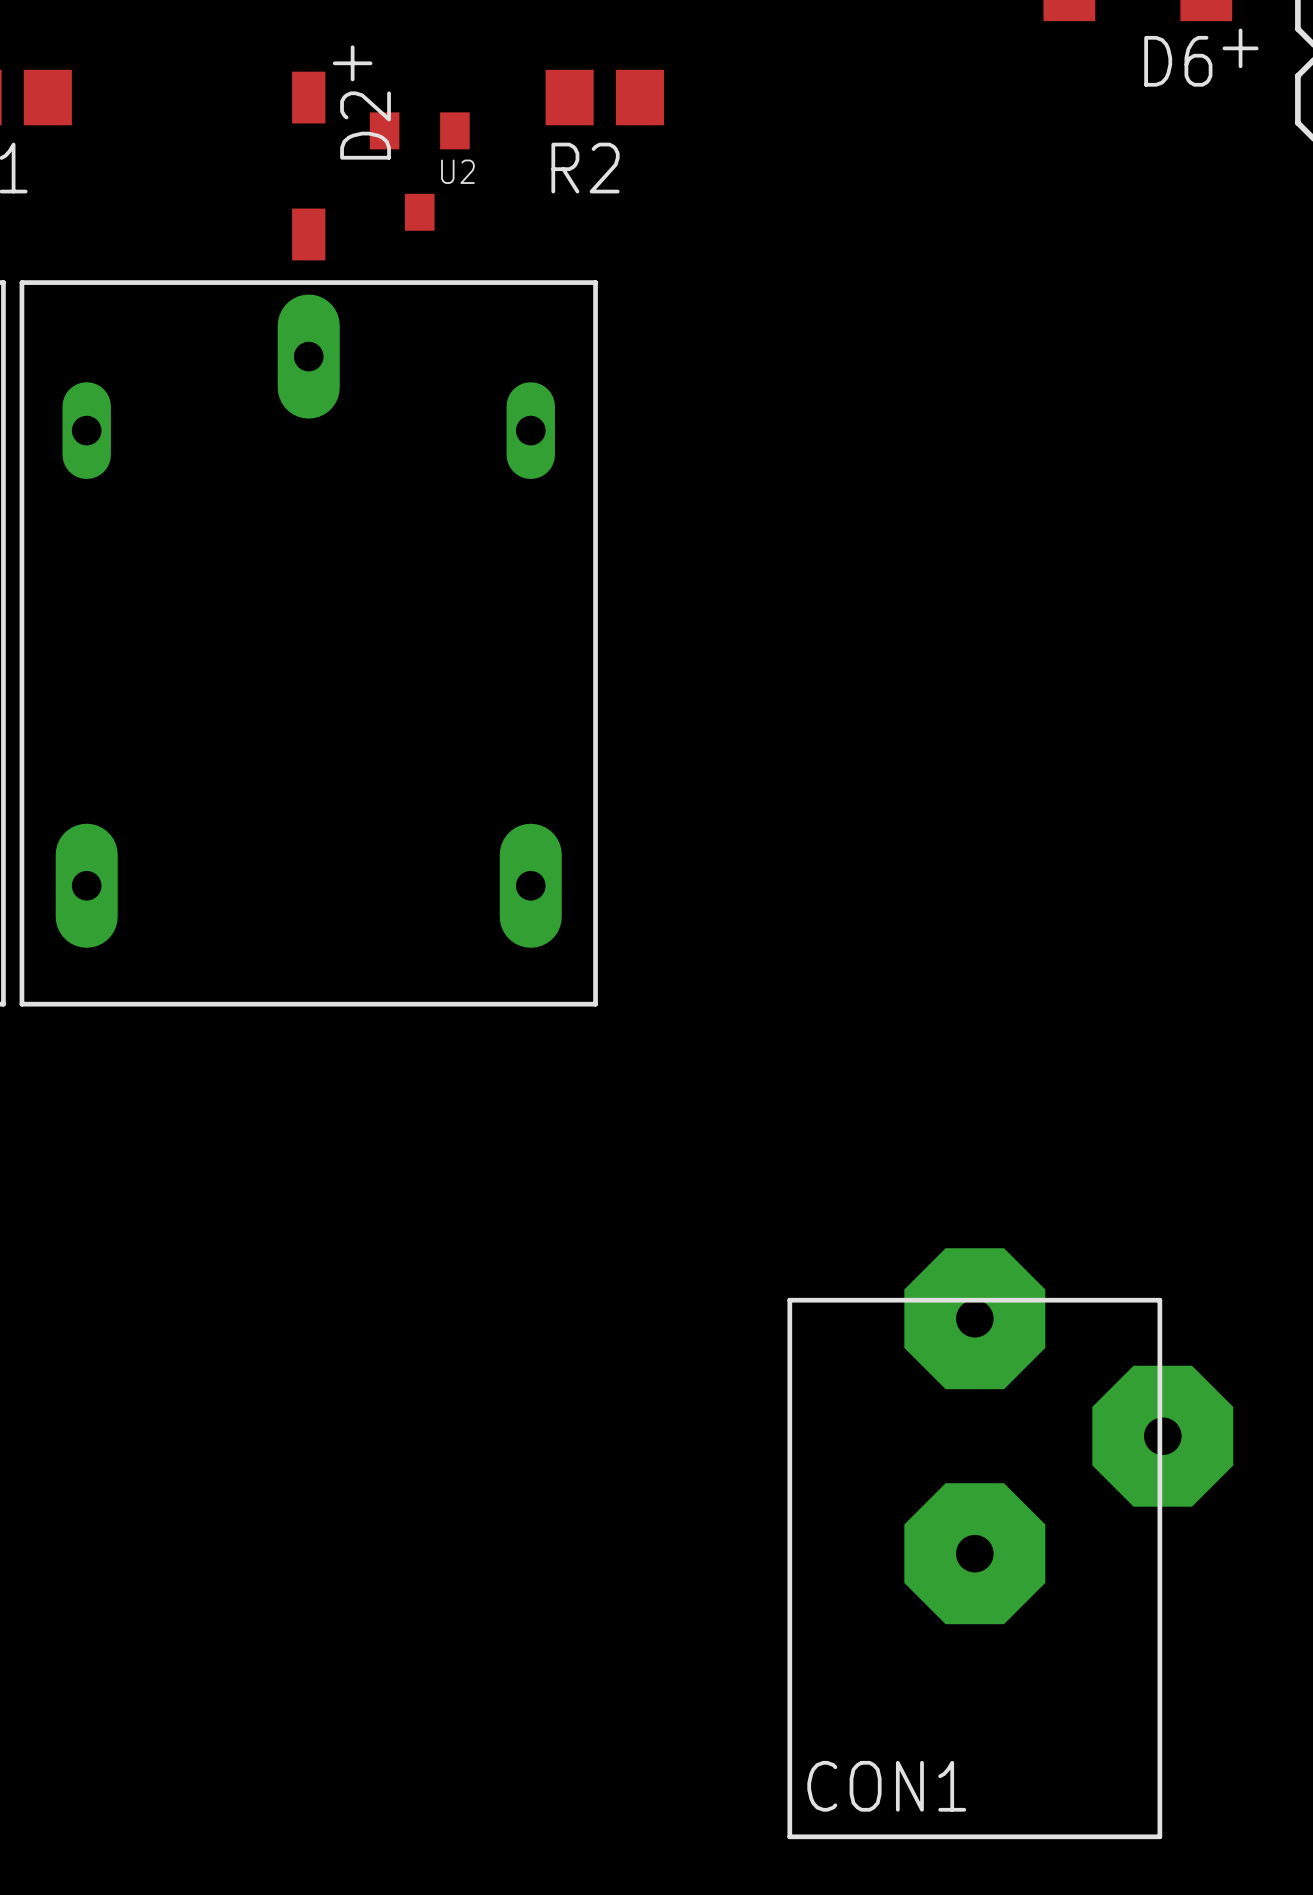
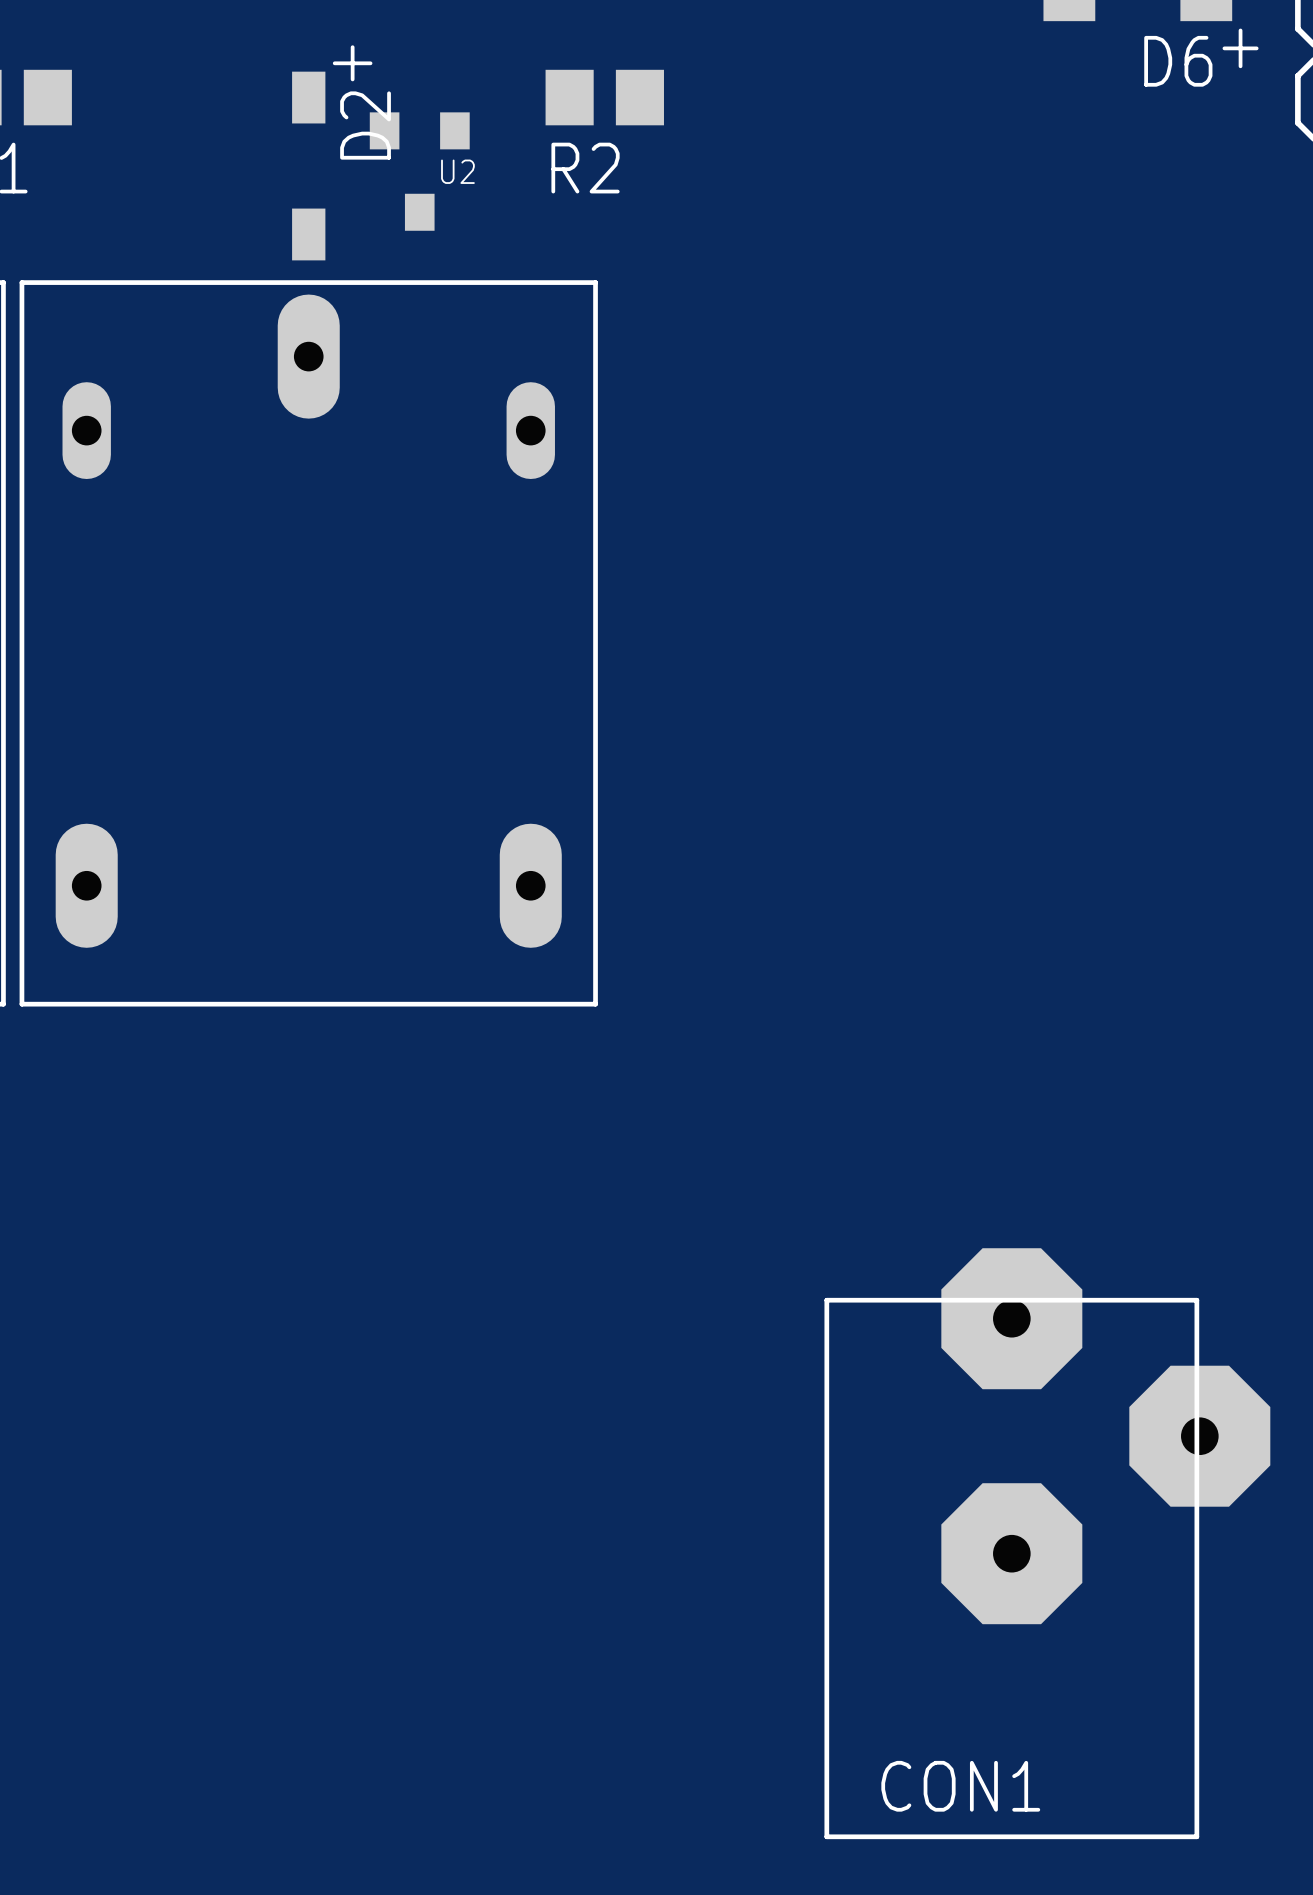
CON1 position: (1010, 1543) -> (1047, 1543)
CON1 name position: CON1 (886, 1786) -> CON1 (960, 1786)

